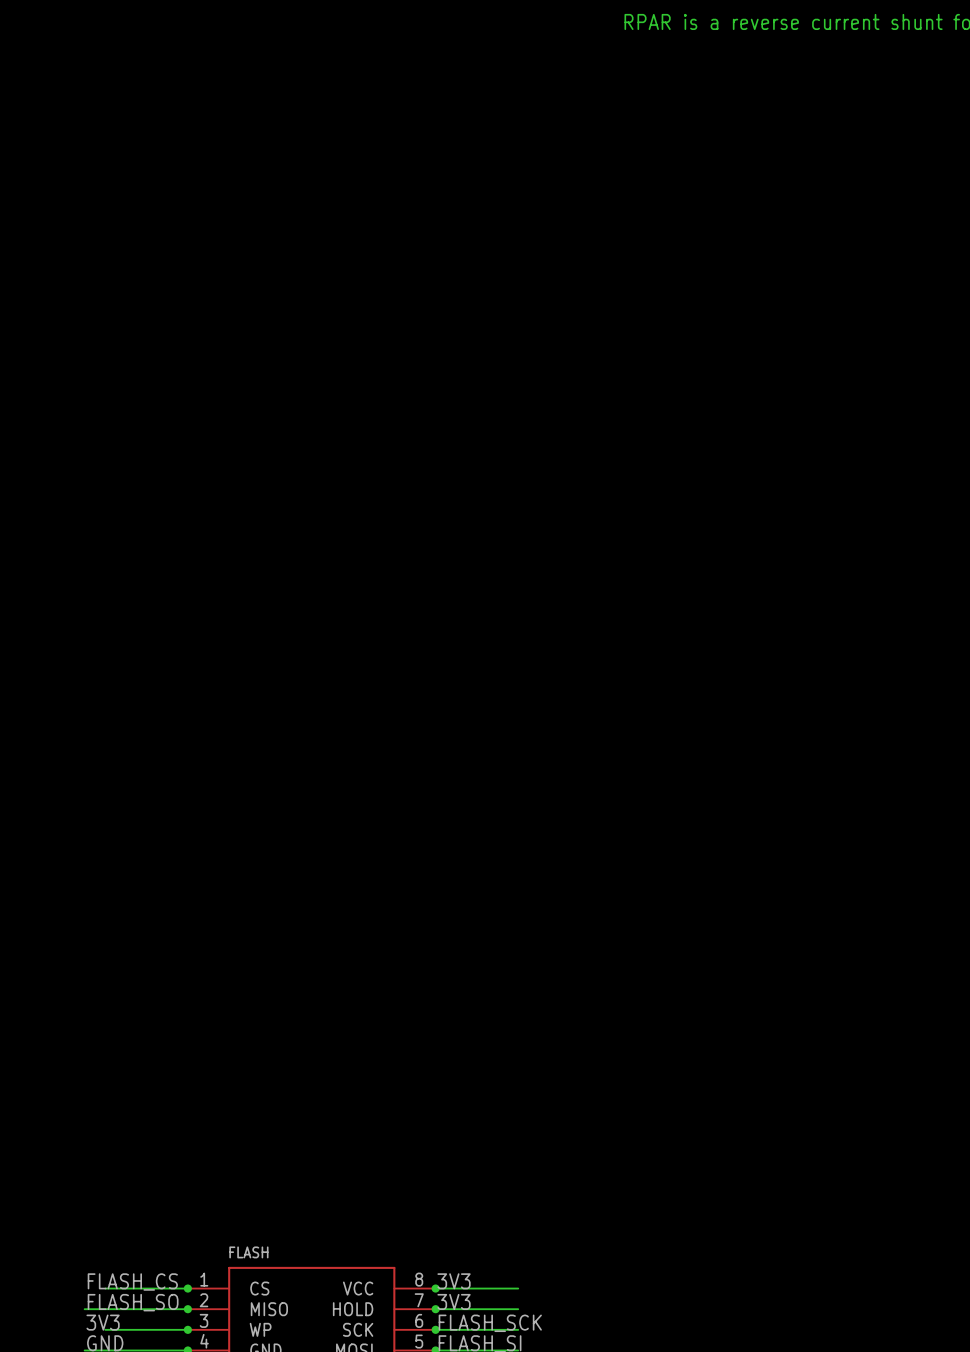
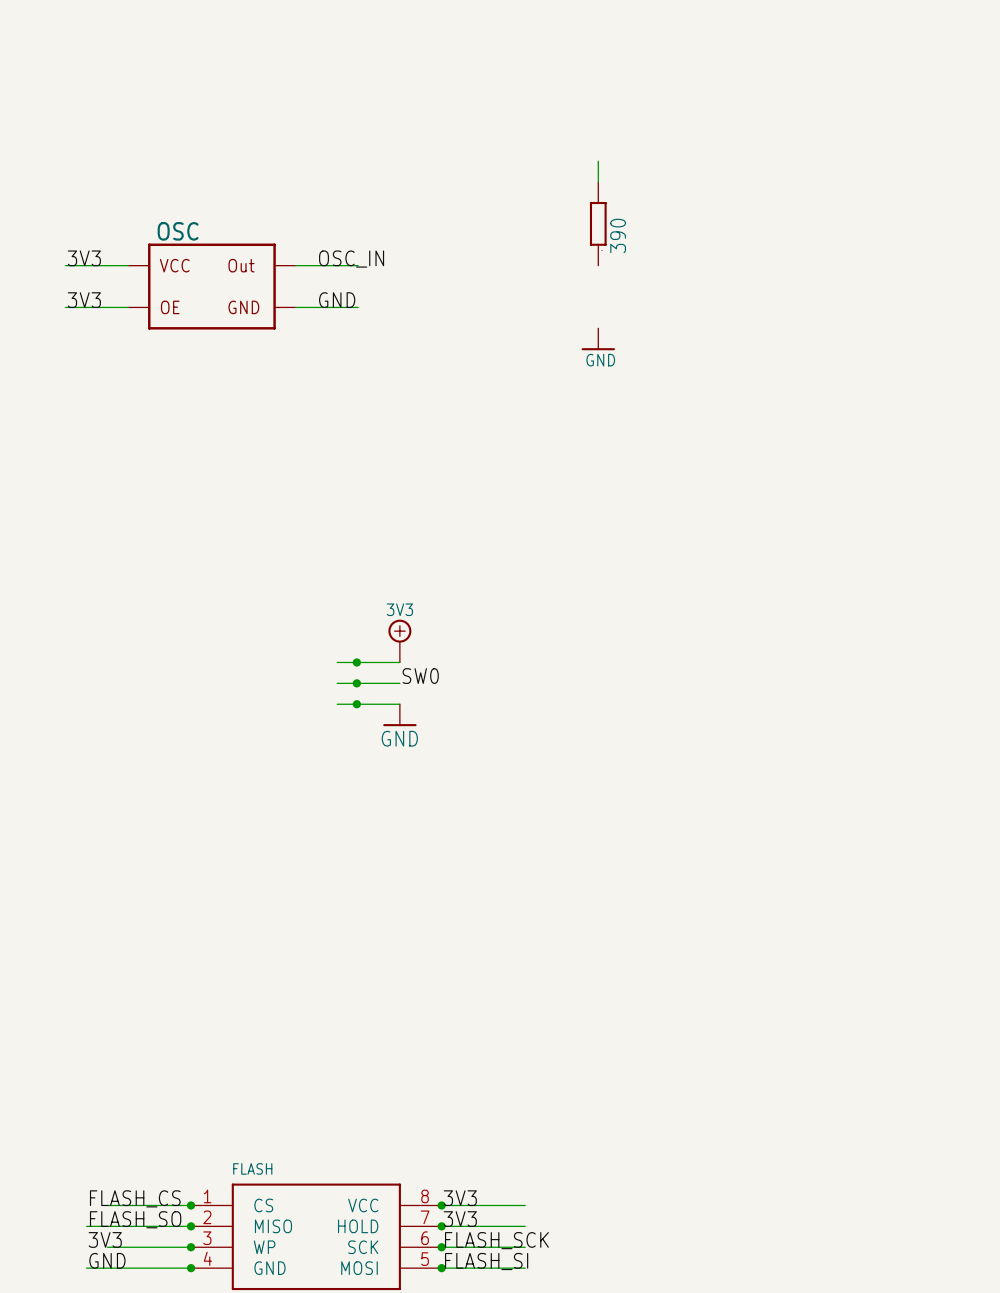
wire: none -> (598, 161) (598, 182)
part: none -> 390 (598, 223)
label: none -> 3V3 (84, 258)
label: none -> OSC_IN (351, 259)
wire: none -> (65, 265) (128, 265)
wire: none -> (295, 265) (358, 265)
OSC: none -> (211, 286)
label: none -> 3V3 (84, 300)
label: none -> GND (337, 300)
wire: none -> (65, 307) (128, 307)
wire: none -> (295, 307) (358, 307)
power symbol: none -> GND (598, 339)
power symbol: none -> 3V3 (399, 641)
wire: none -> (337, 662) (399, 662)
junction: none -> (356, 662)
label: none -> SW0 (420, 676)
wire: none -> (337, 683) (399, 683)
junction: none -> (356, 683)
wire: none -> (337, 704) (399, 704)
junction: none -> (356, 704)
power symbol: none -> GND (399, 715)

